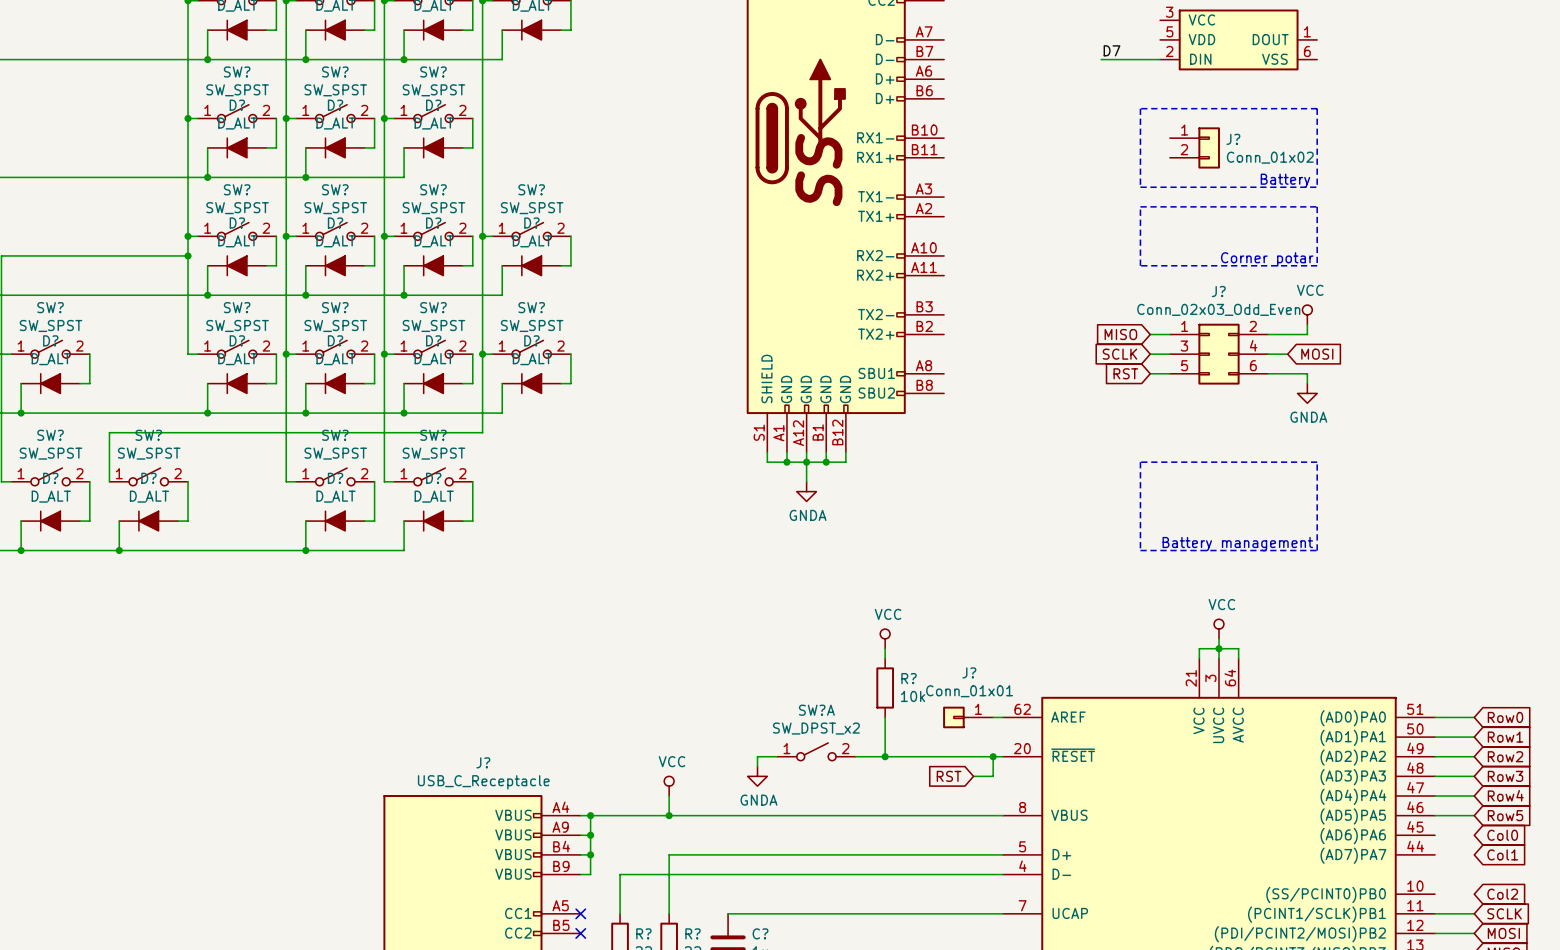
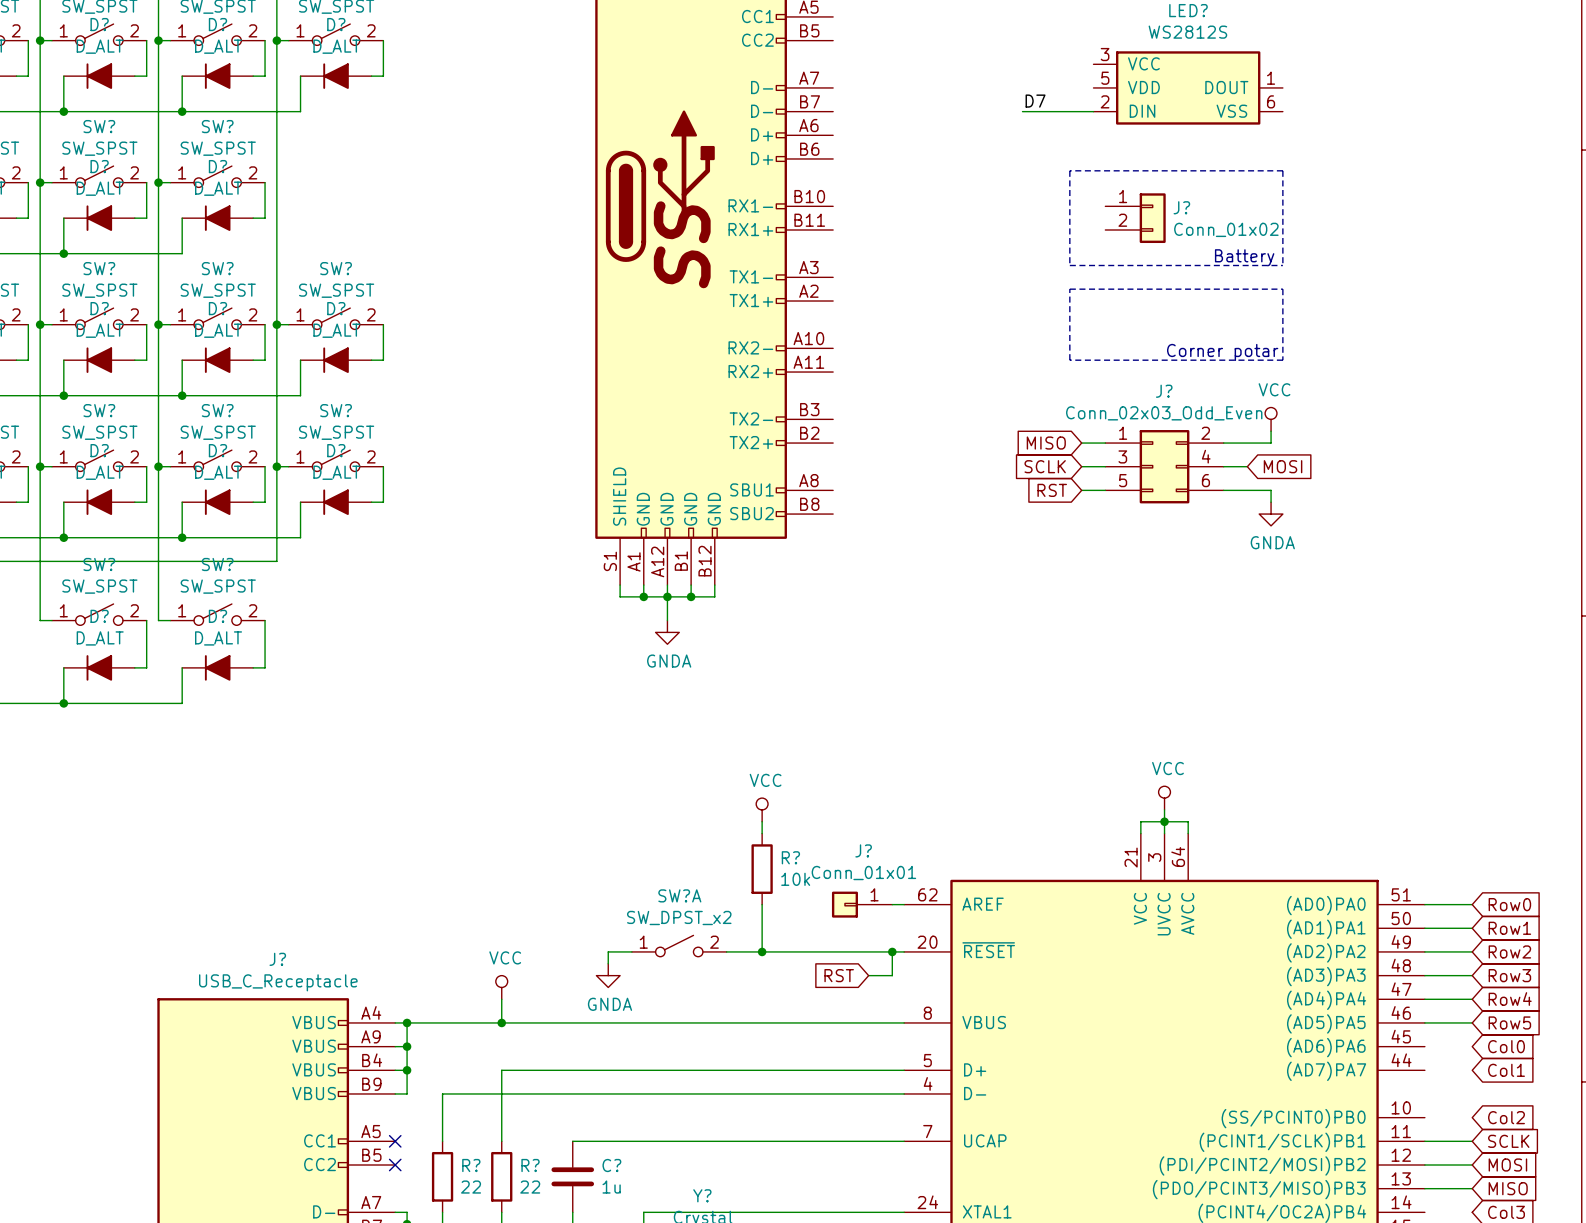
line: (1140, 462) (1317, 462) (1317, 550) (1140, 550) (1140, 462) -> none
text: Battery management (1237, 544) -> none

